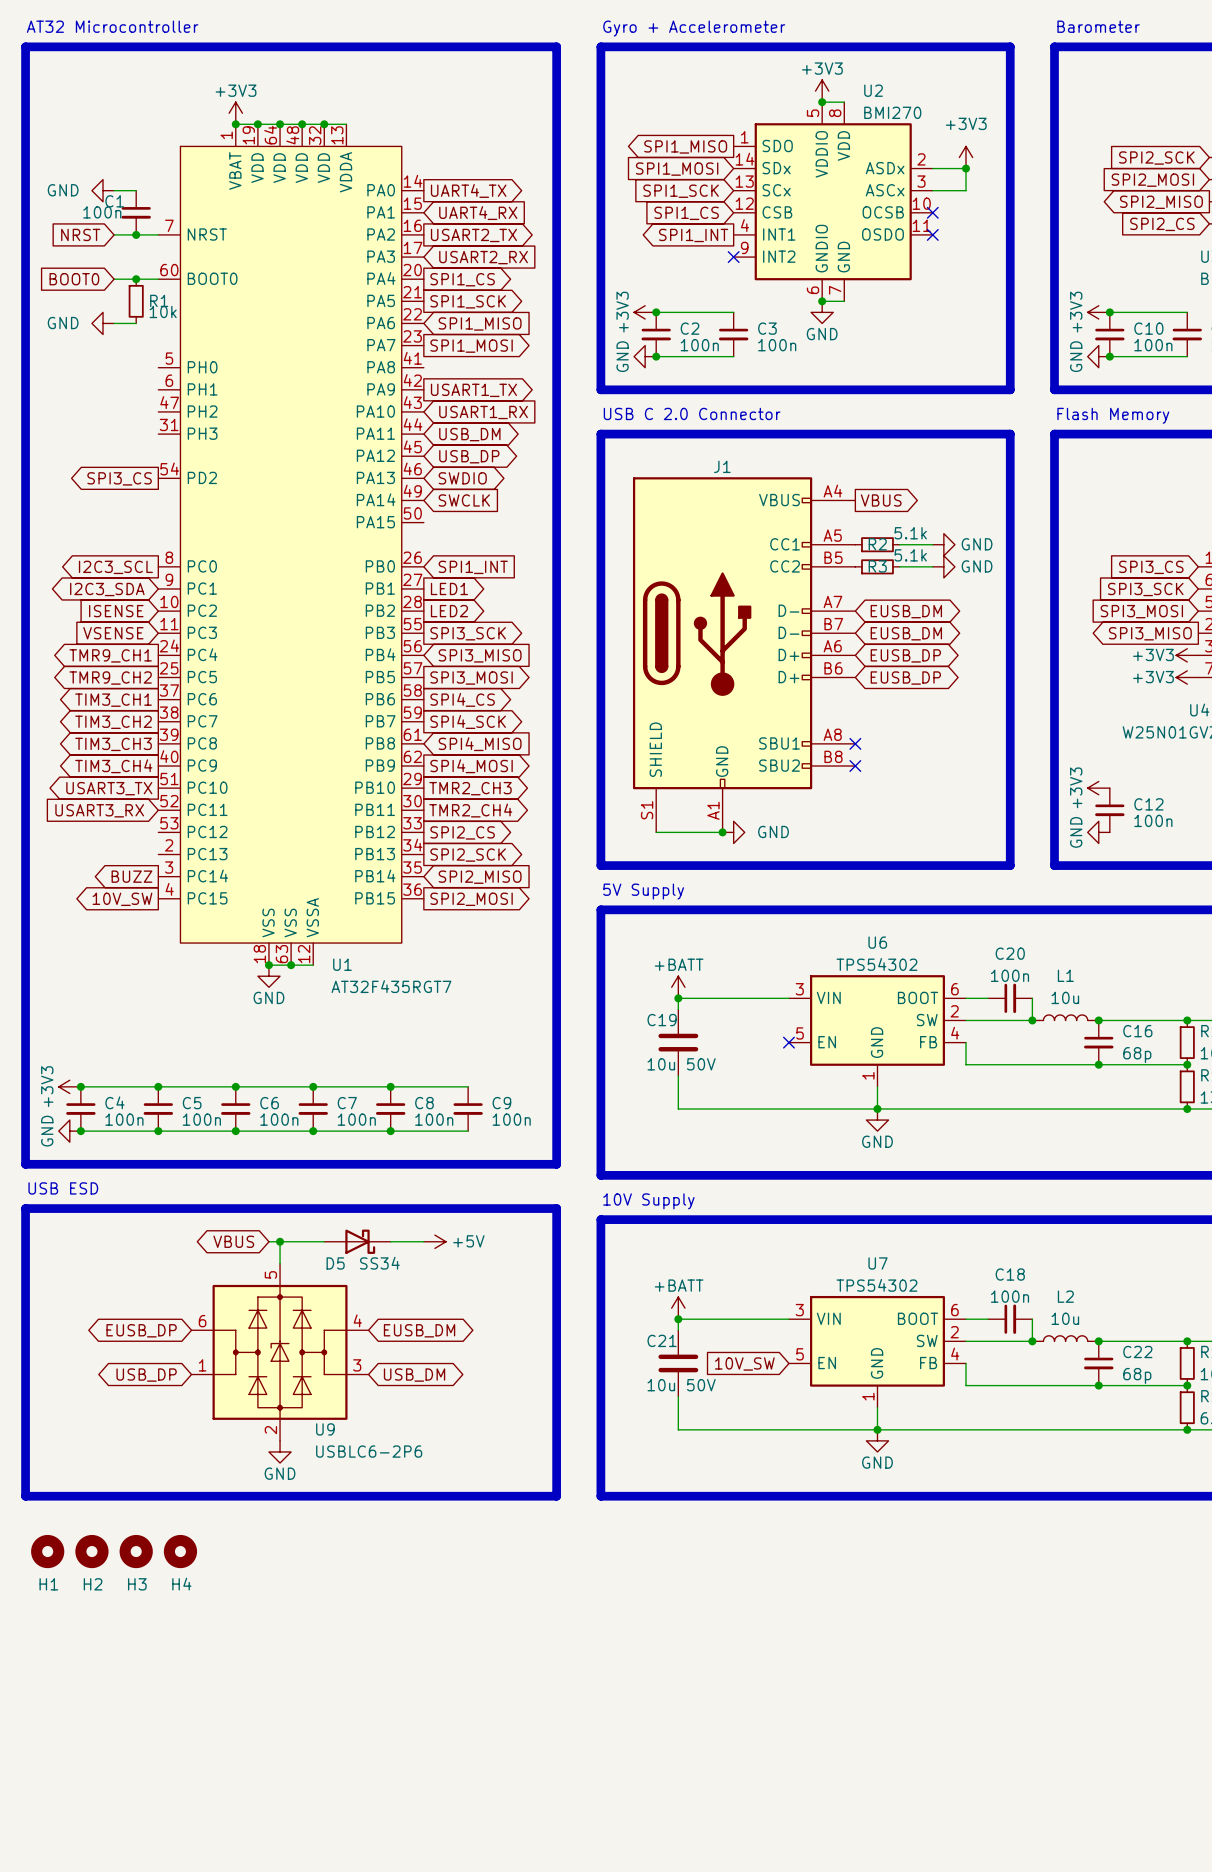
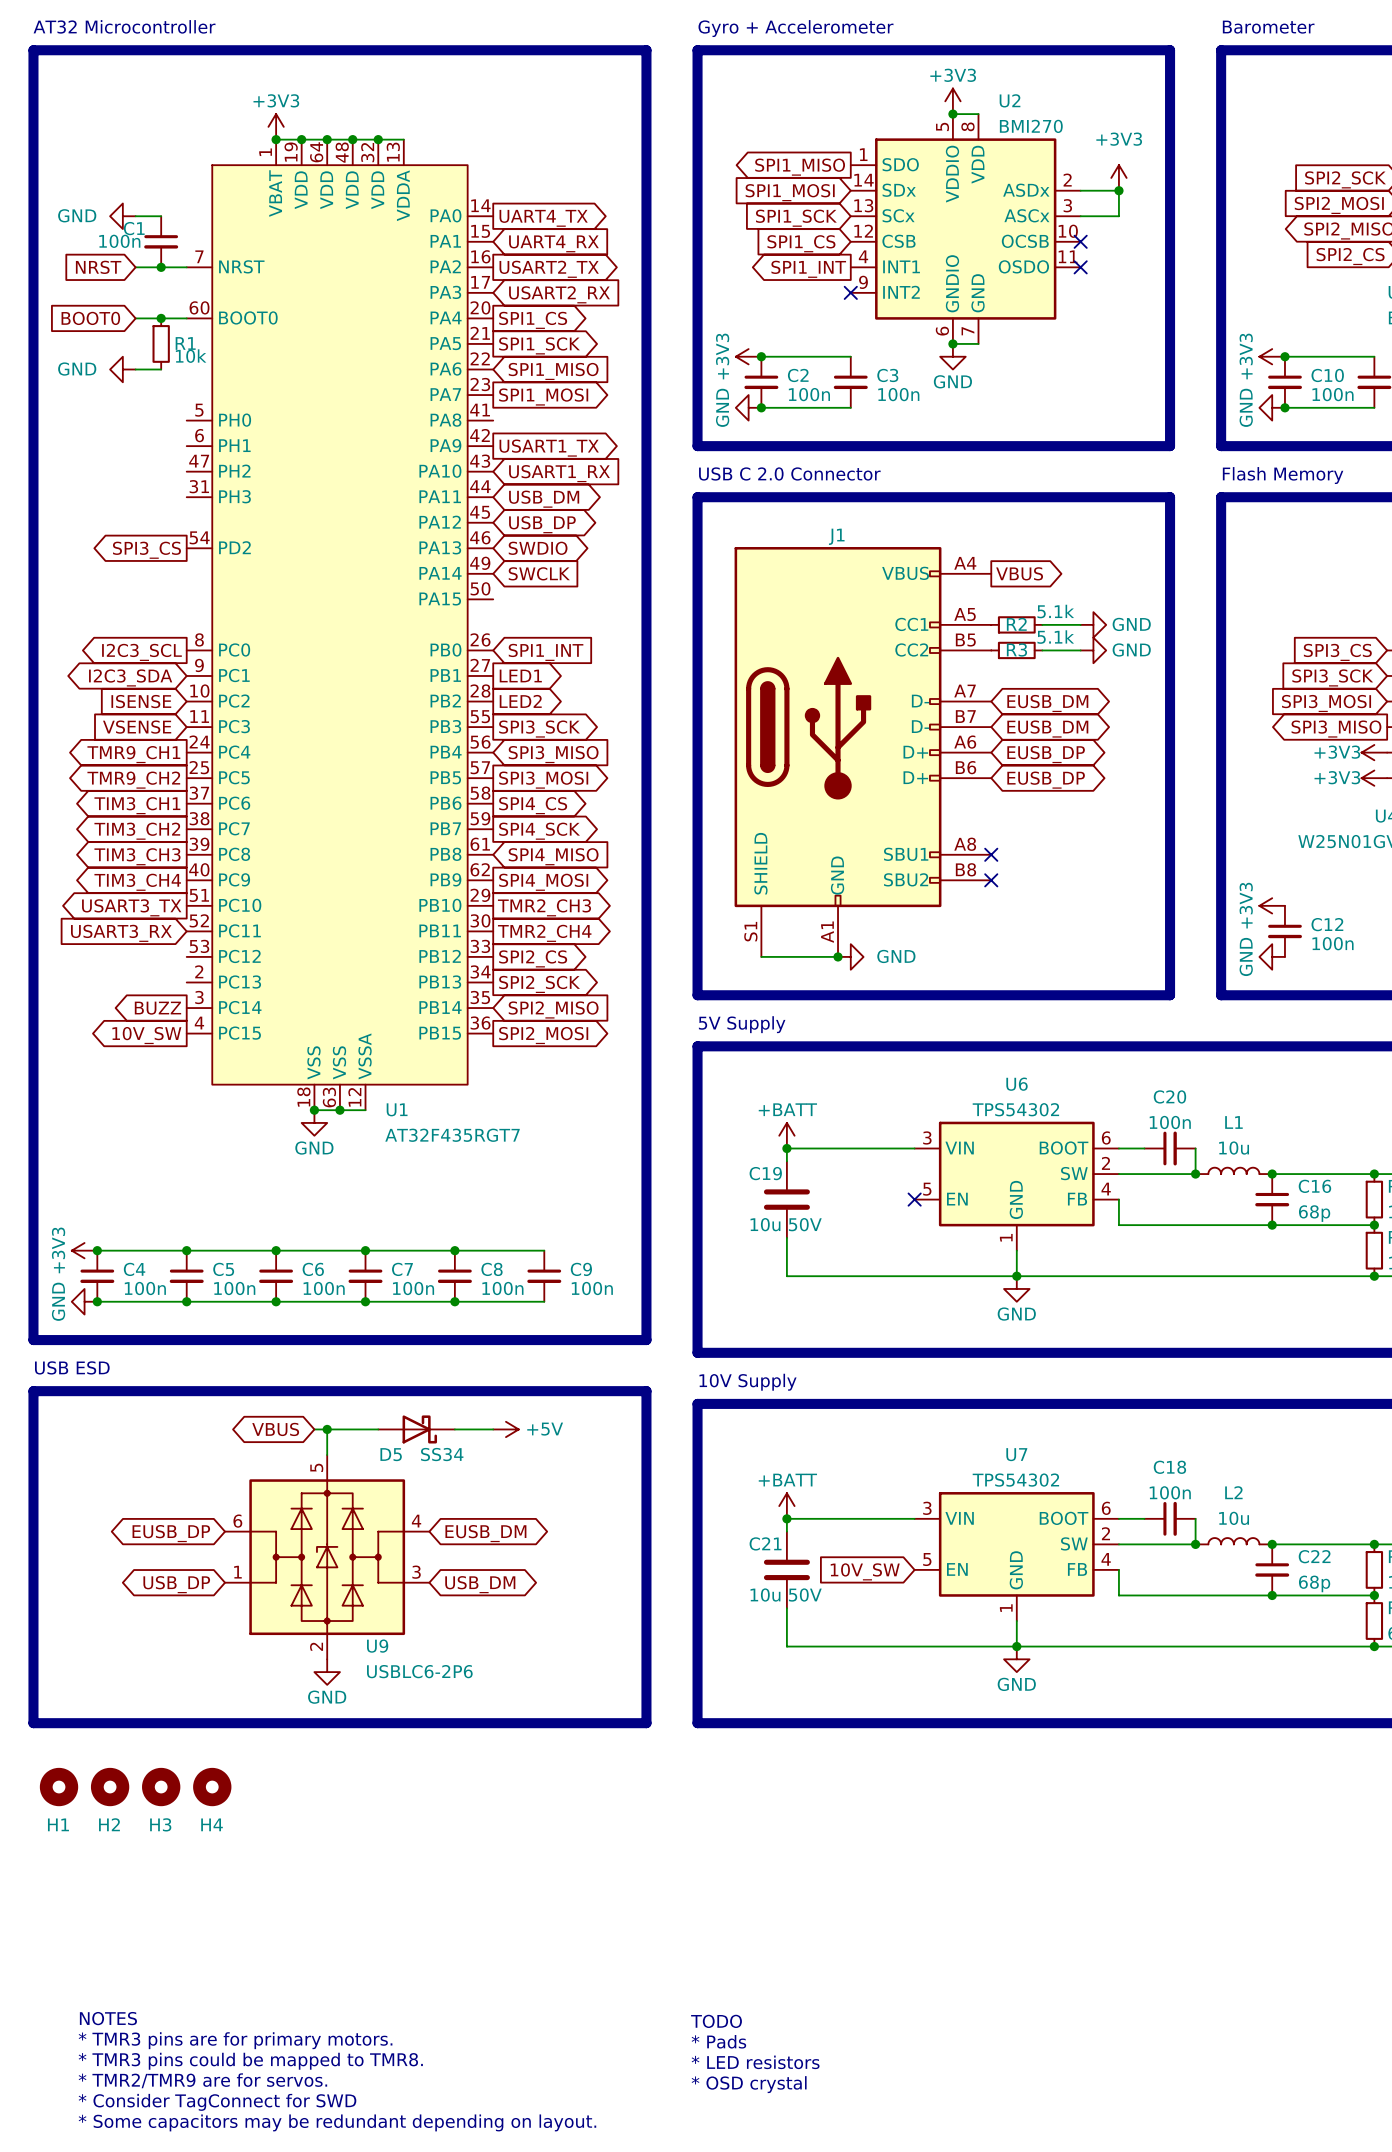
text: none -> NOTES (108, 2018)
text: none -> TODO (716, 2021)
text: none -> * TMR3 pins are for primary motors. (235, 2040)
text: none -> * Pads (718, 2041)
text: none -> * TMR3 pins could be mapped to TMR8. (250, 2061)
text: none -> * LED resistors (755, 2062)
text: none -> * TMR2/TMR9 are for servos. (202, 2080)
text: none -> * OSD crystal (749, 2084)
text: none -> * Consider TagConnect for SWD (217, 2102)
text: none -> * Some capacitors may be redundant depending on layout. (337, 2122)

